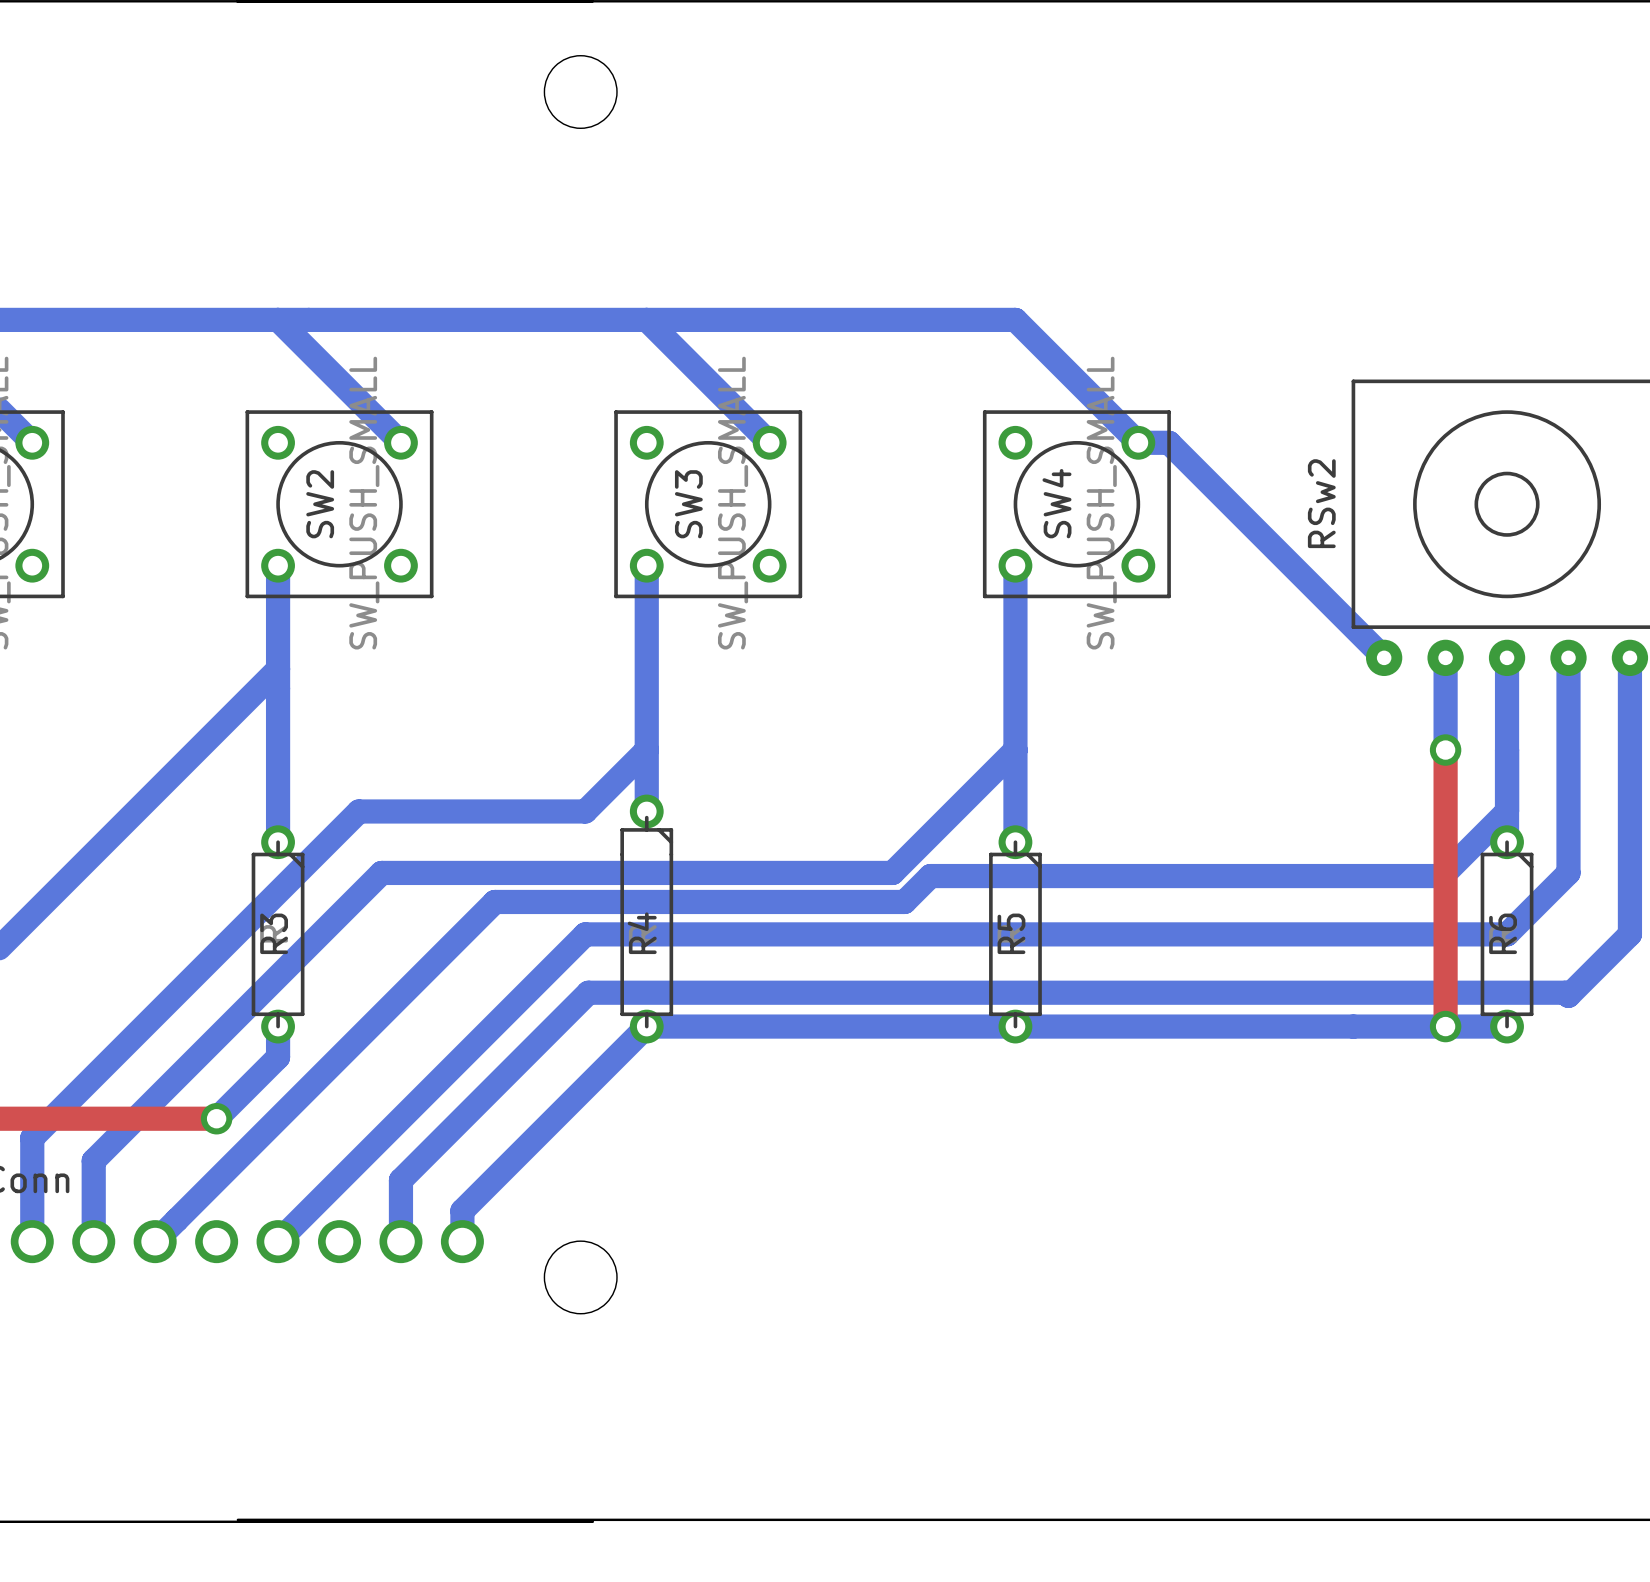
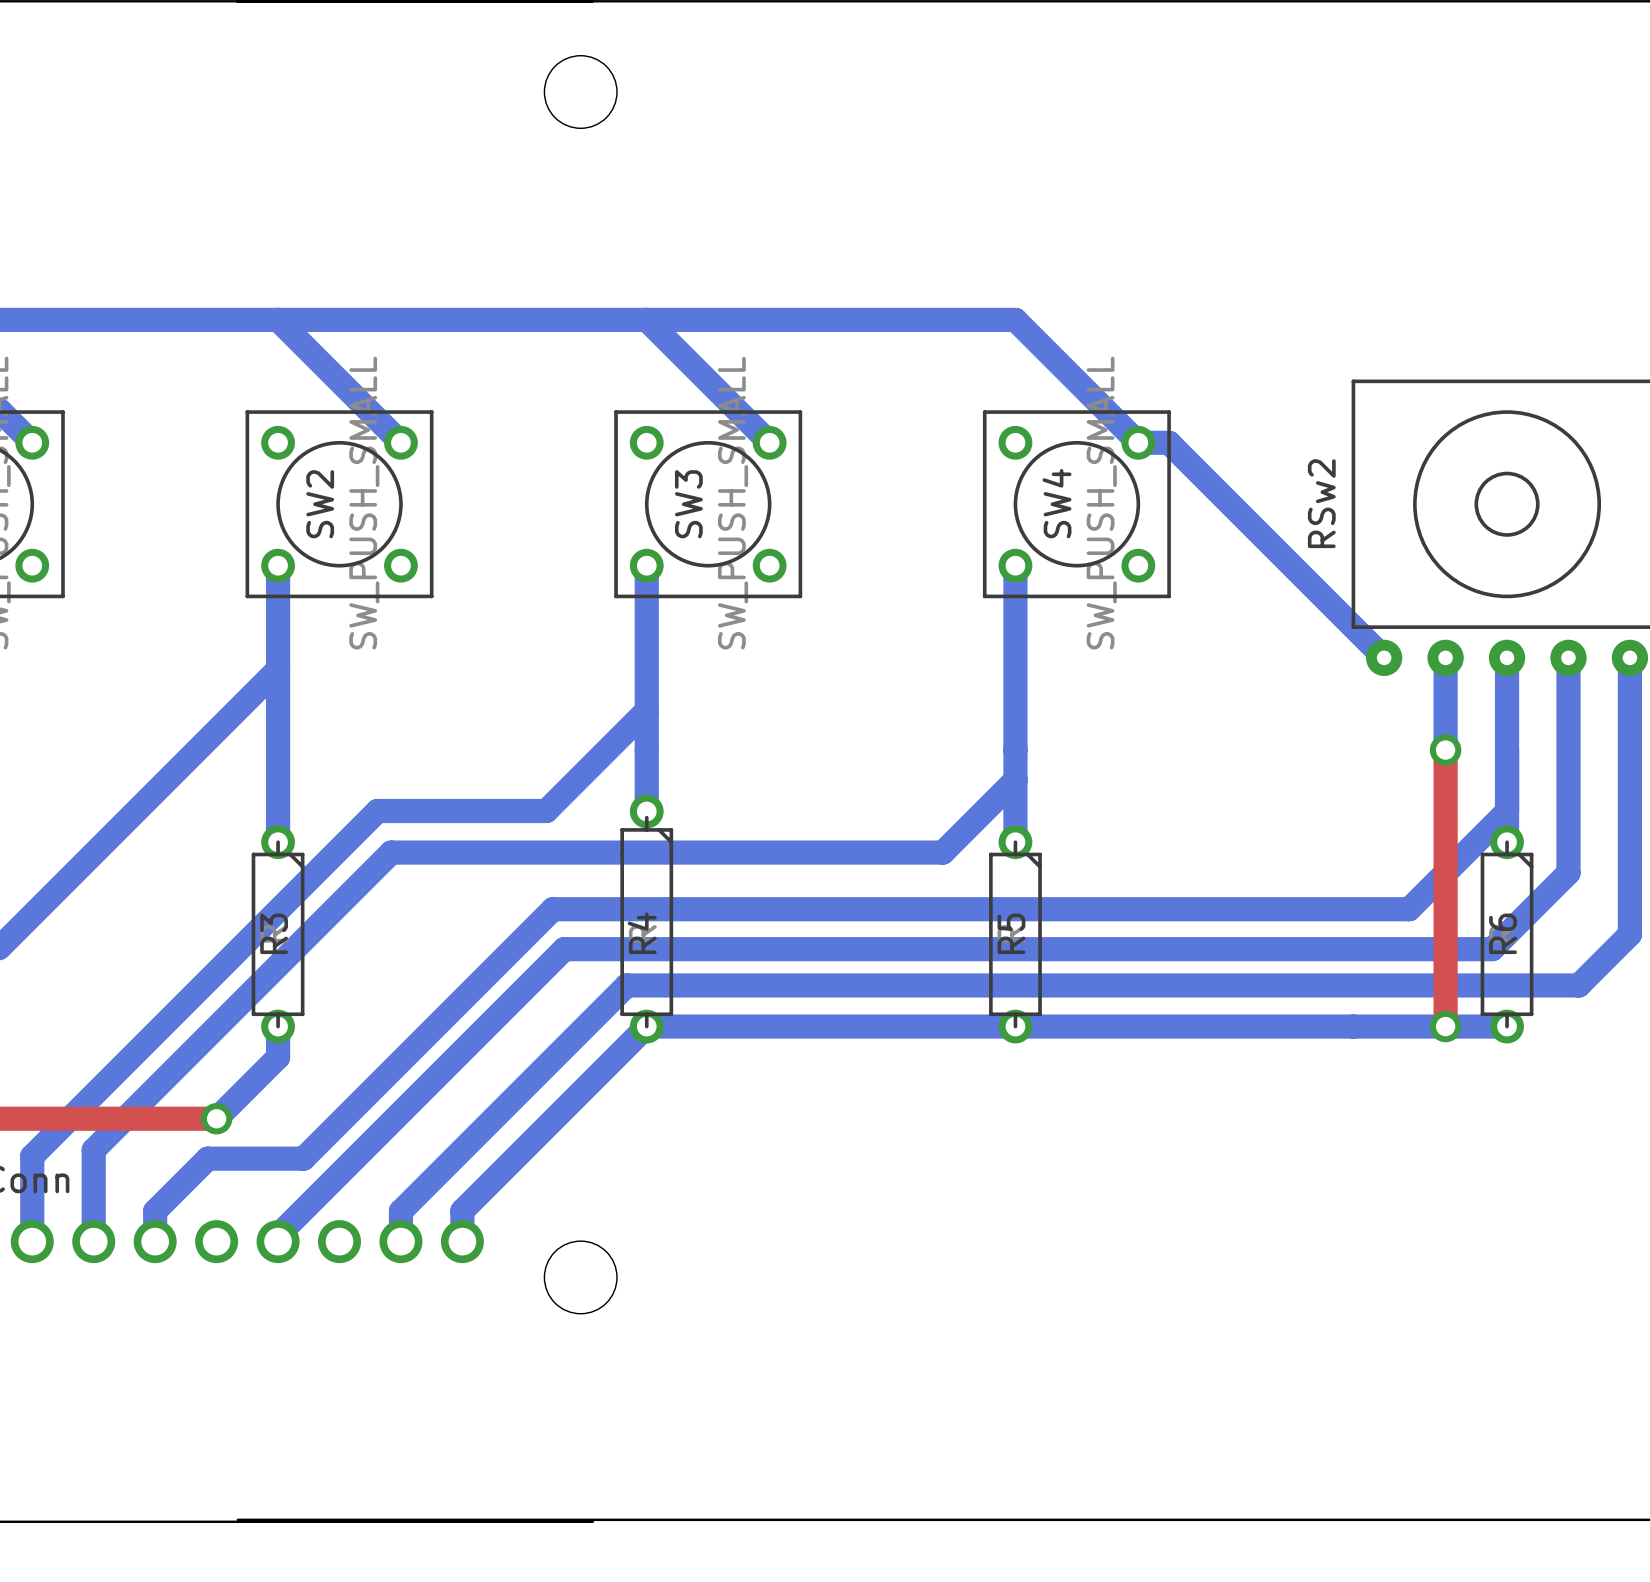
bottom track: (646, 750) (585, 811) (358, 811) (32, 1138) (32, 1156) -> (646, 710) (546, 811) (377, 811) (32, 1156)
bottom track: (1015, 750) (892, 872) (381, 872) (93, 1160) -> (1015, 780) (942, 852) (391, 852) (93, 1150) (93, 1160)
bottom track: (1442, 876) (930, 876) (904, 901) (494, 901) (155, 1241) -> (1442, 876) (1409, 909) (552, 909) (303, 1158) (207, 1158) (155, 1211) (155, 1241)
bottom track: (1507, 934) (585, 934) (278, 1241) -> (1507, 934) (1492, 949) (564, 949) (278, 1235) (278, 1241)
bottom track: (1578, 985) (1568, 995) (1565, 992) (588, 992) (400, 1180) (400, 1211) -> (1578, 985) (626, 985) (400, 1211)

